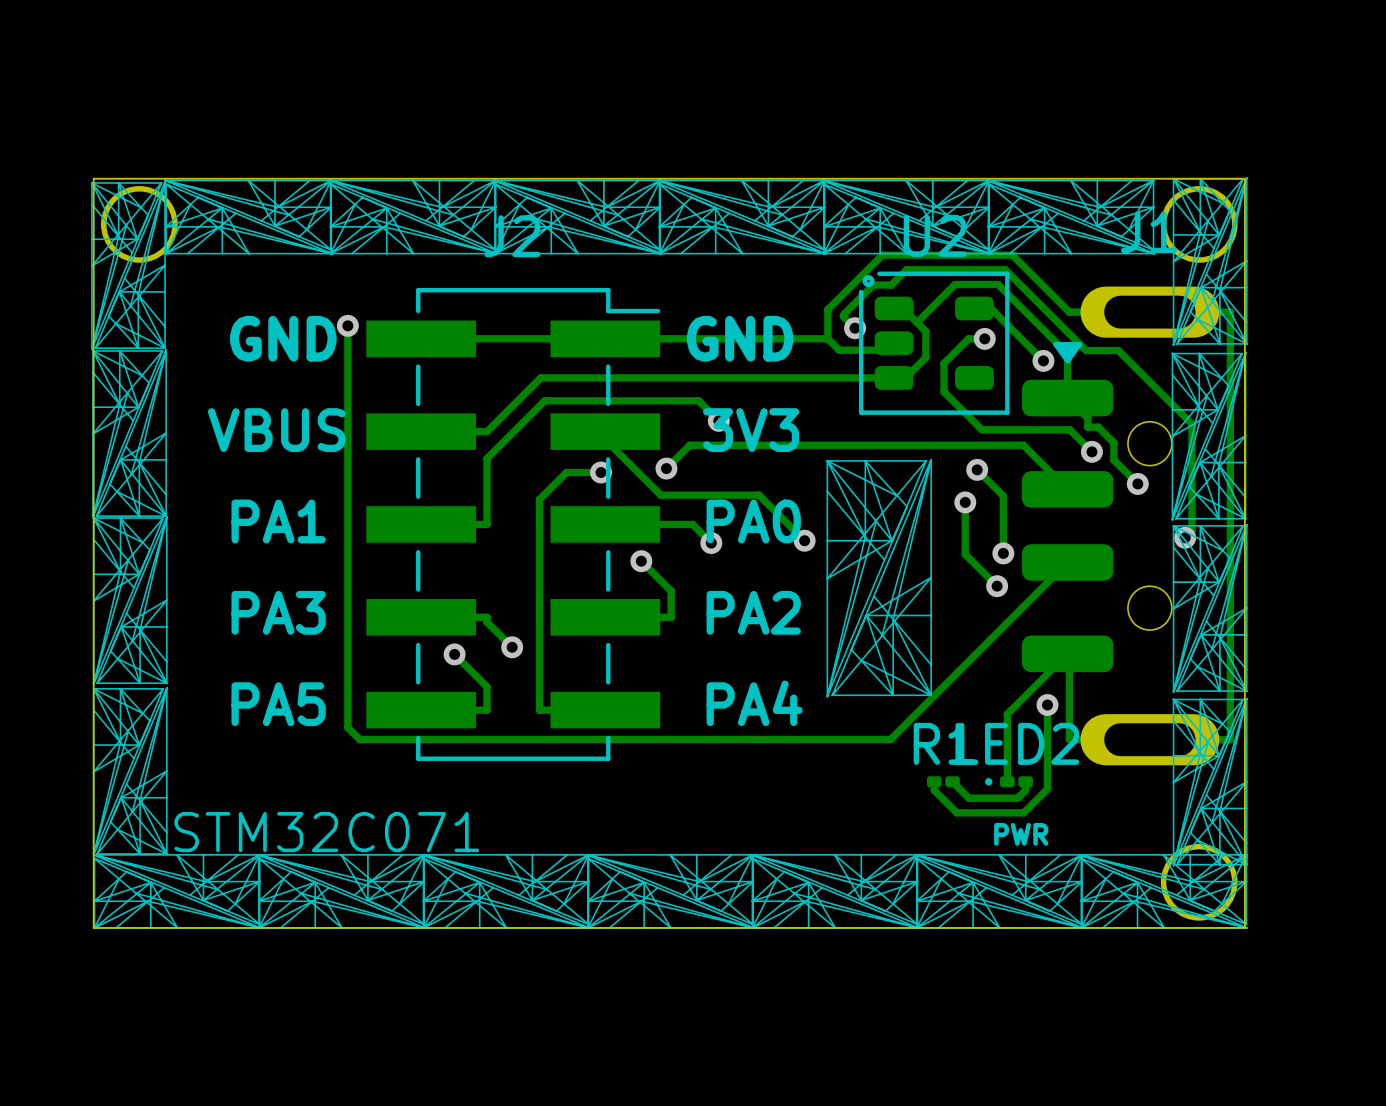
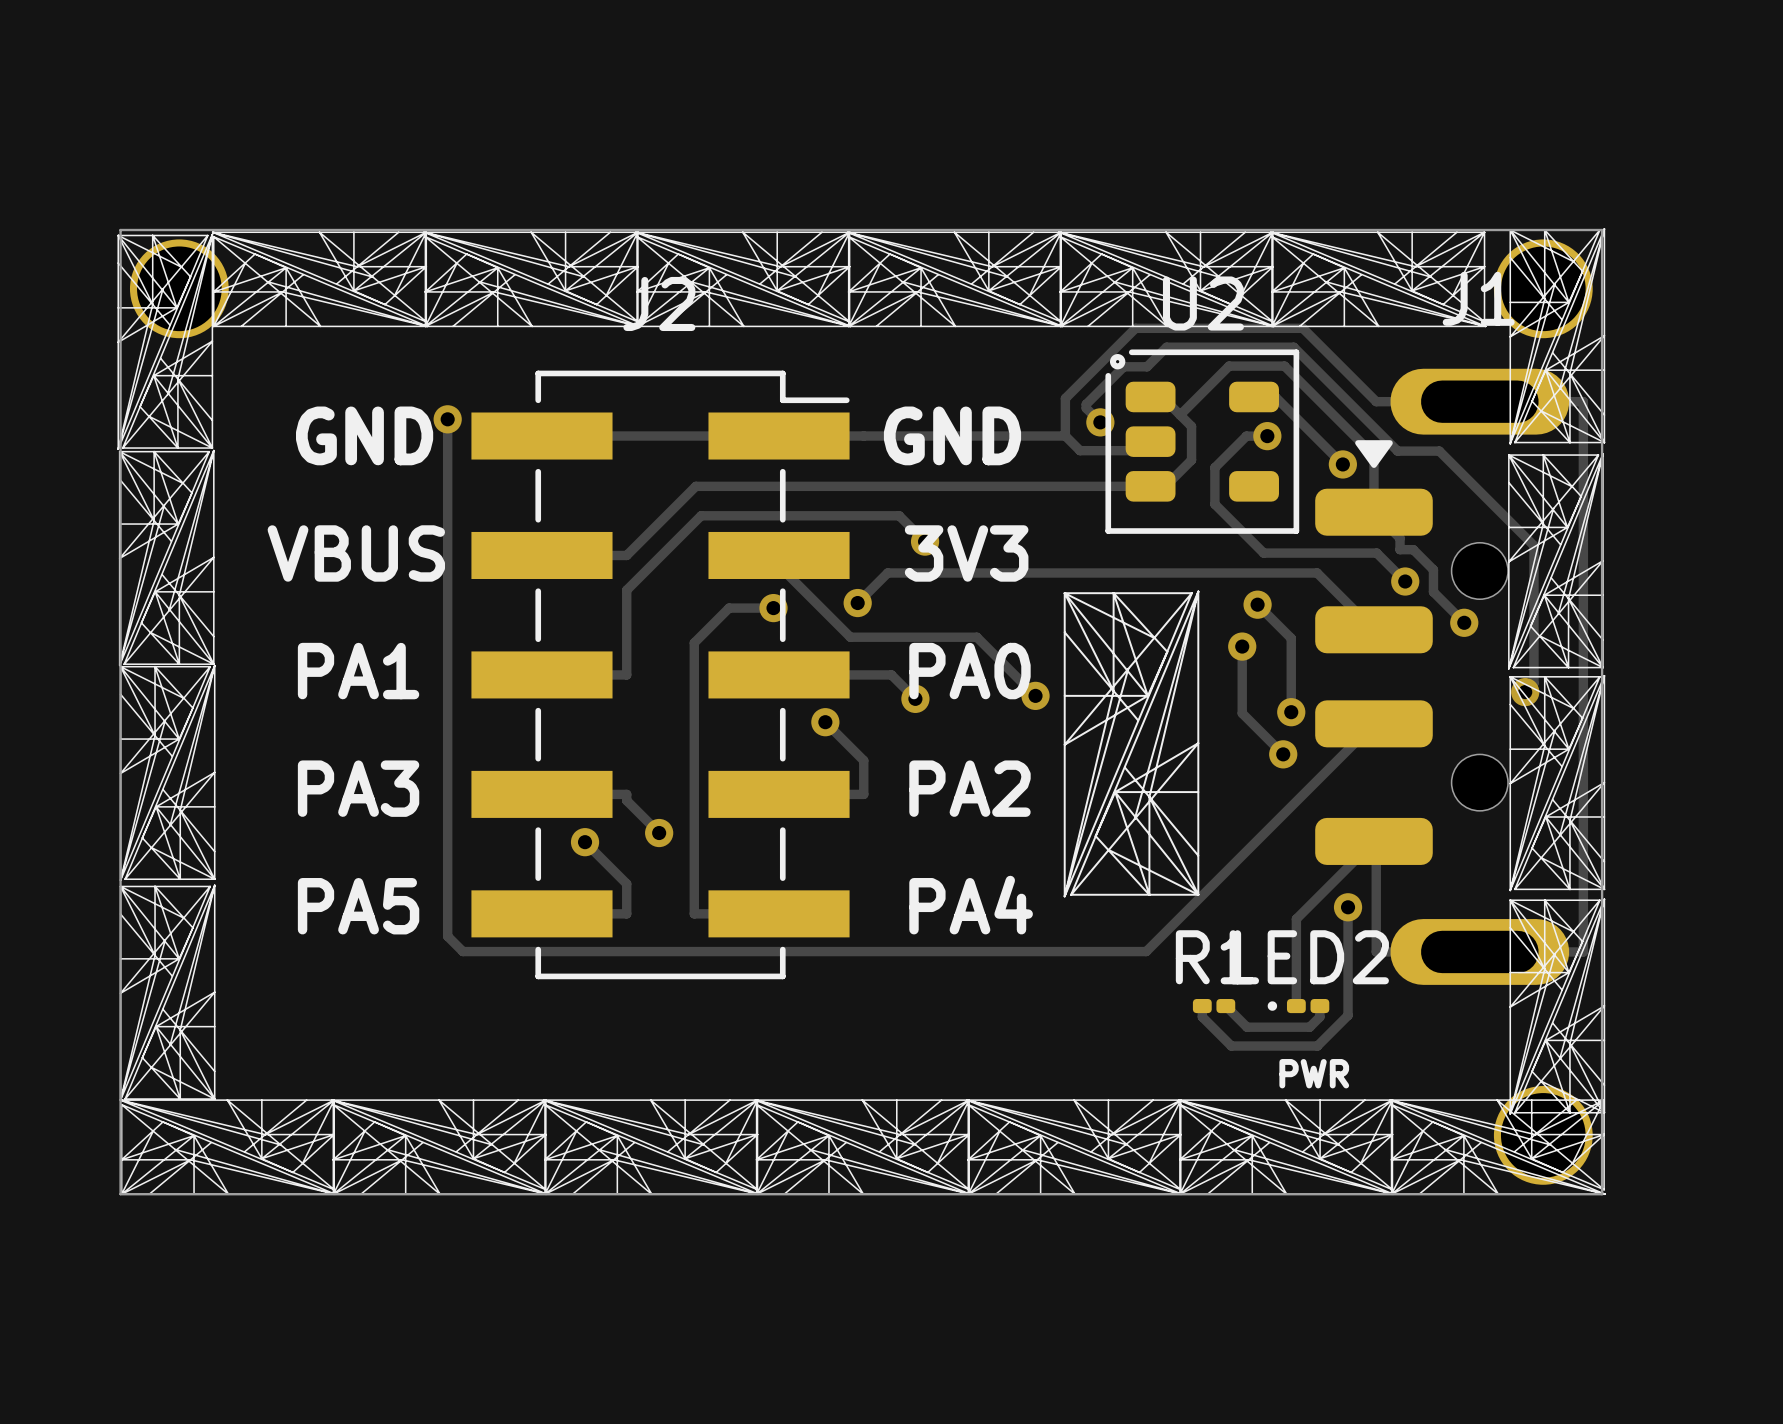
text: STM32C071 (326, 832) -> none

